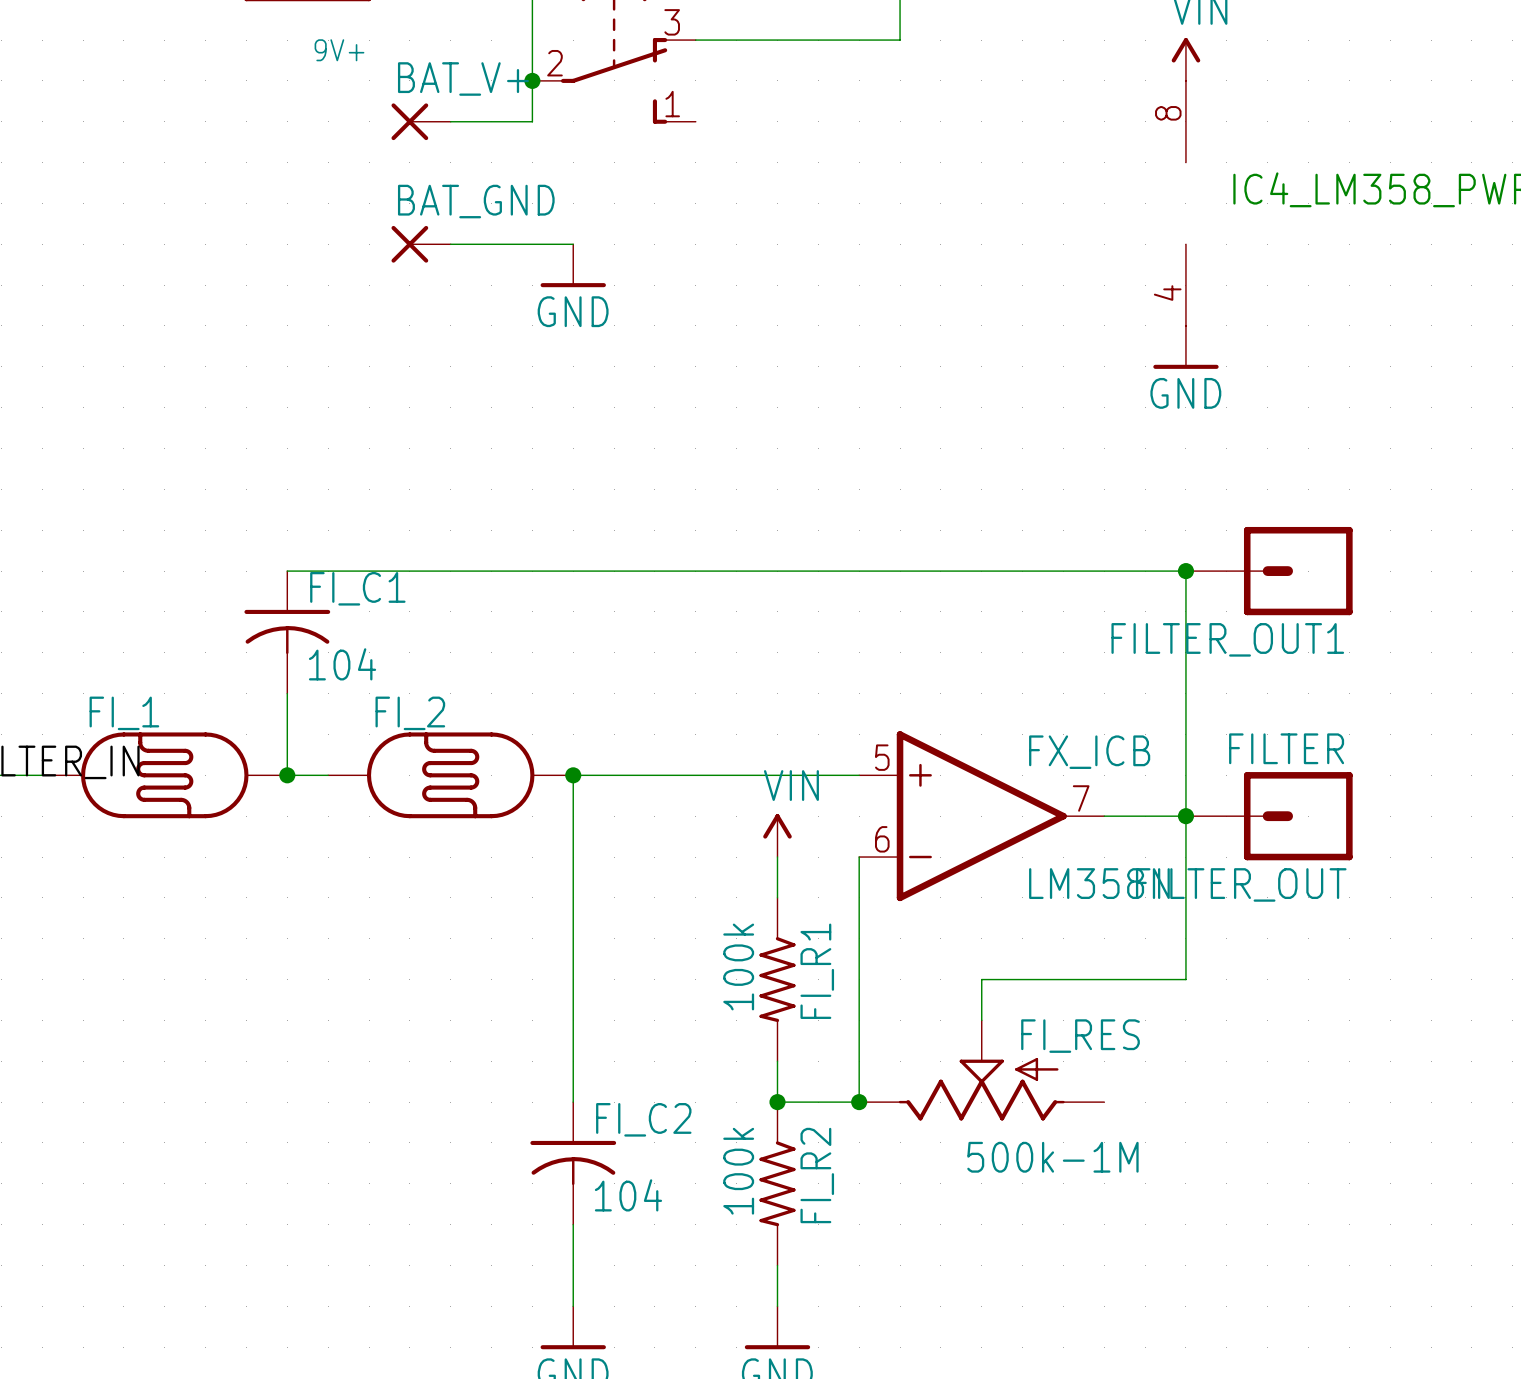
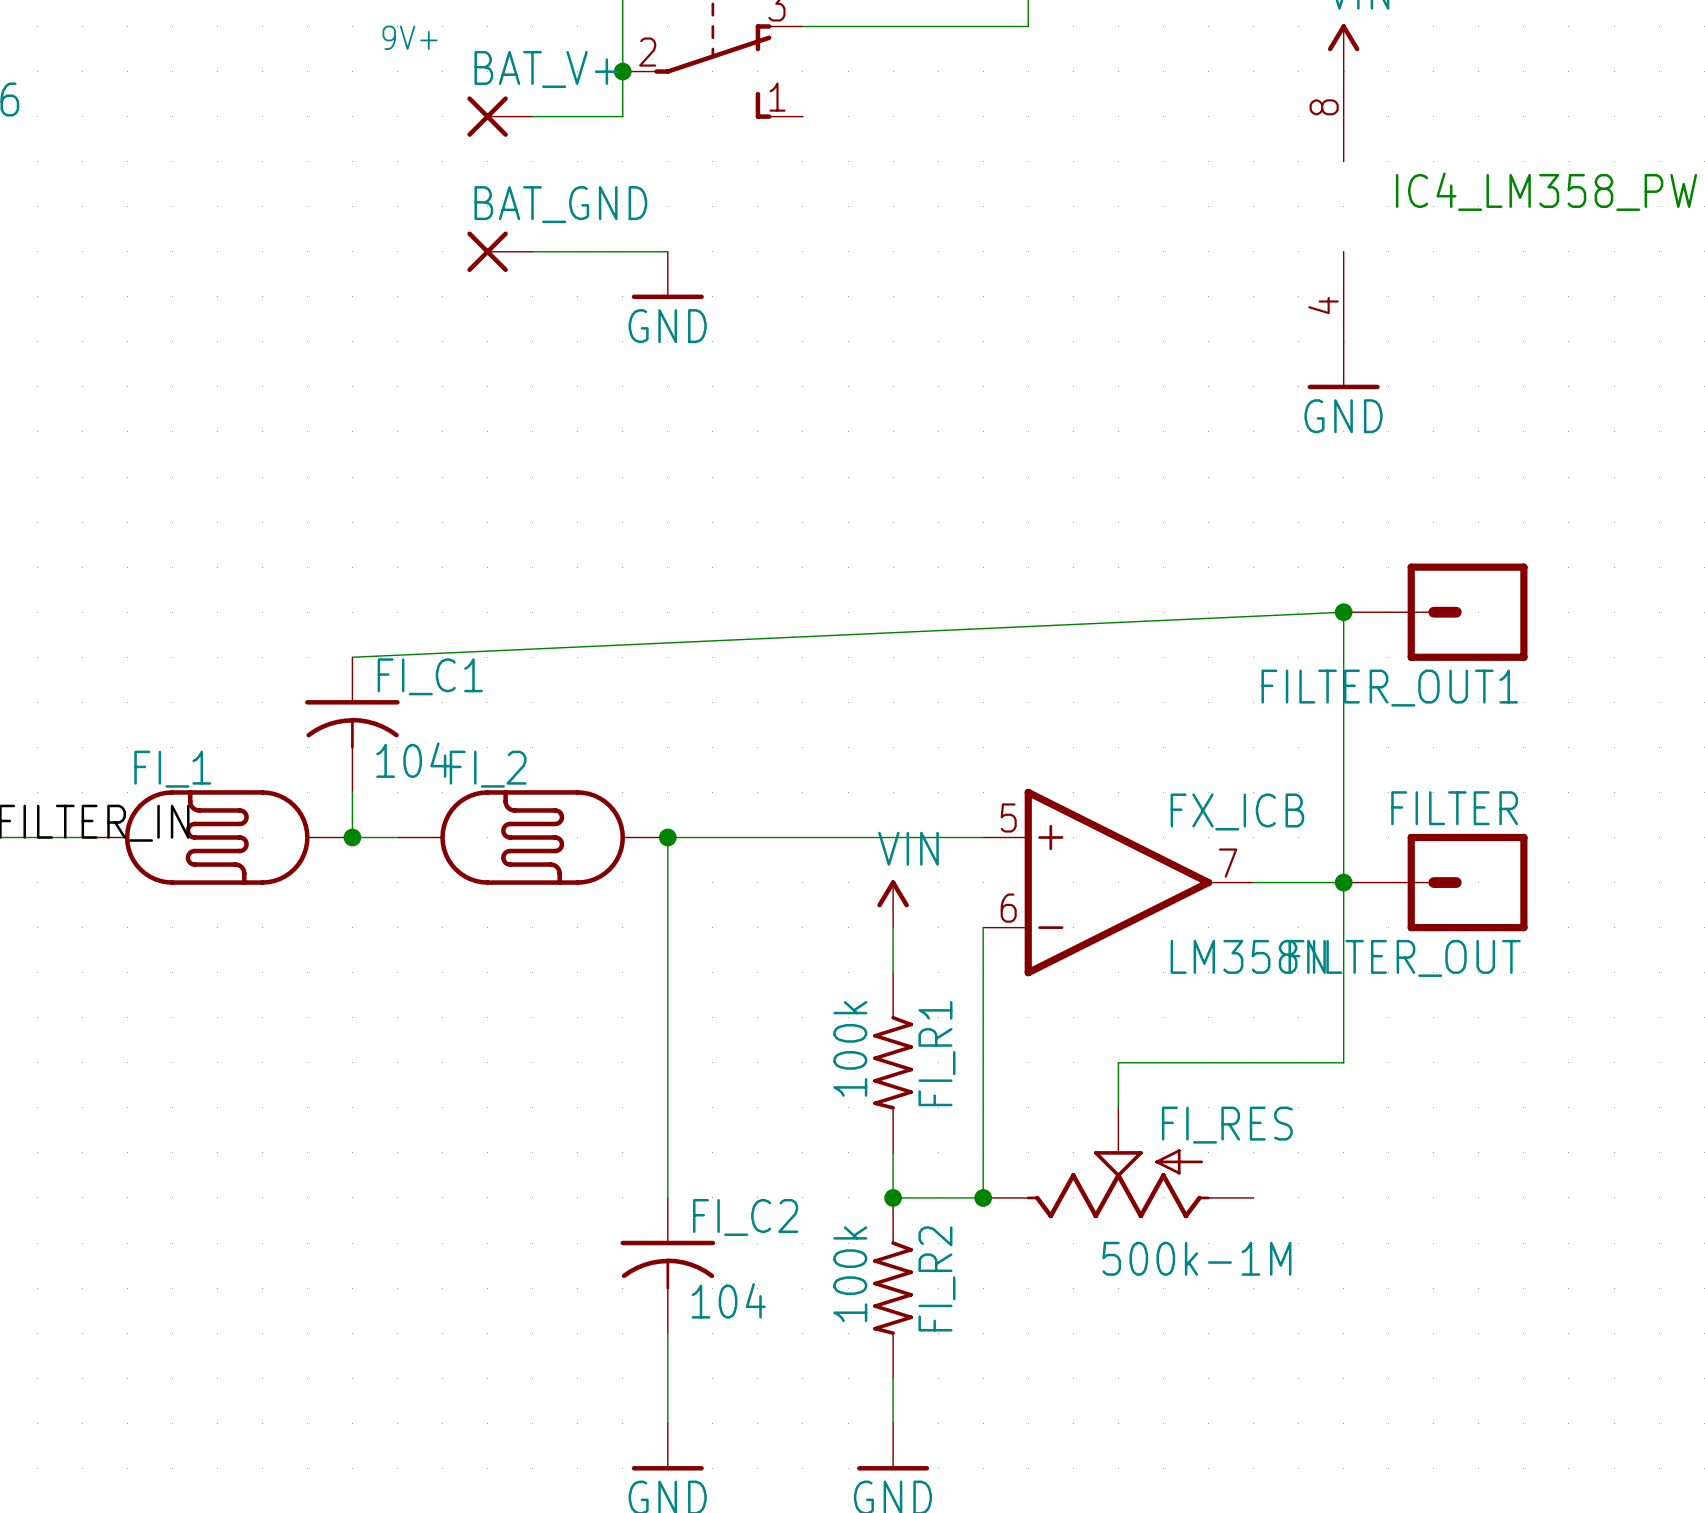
wire: (287, 571) (1185, 571) -> (352, 657) (1343, 612)
FI_C1 position: (287, 632) -> (352, 724)

